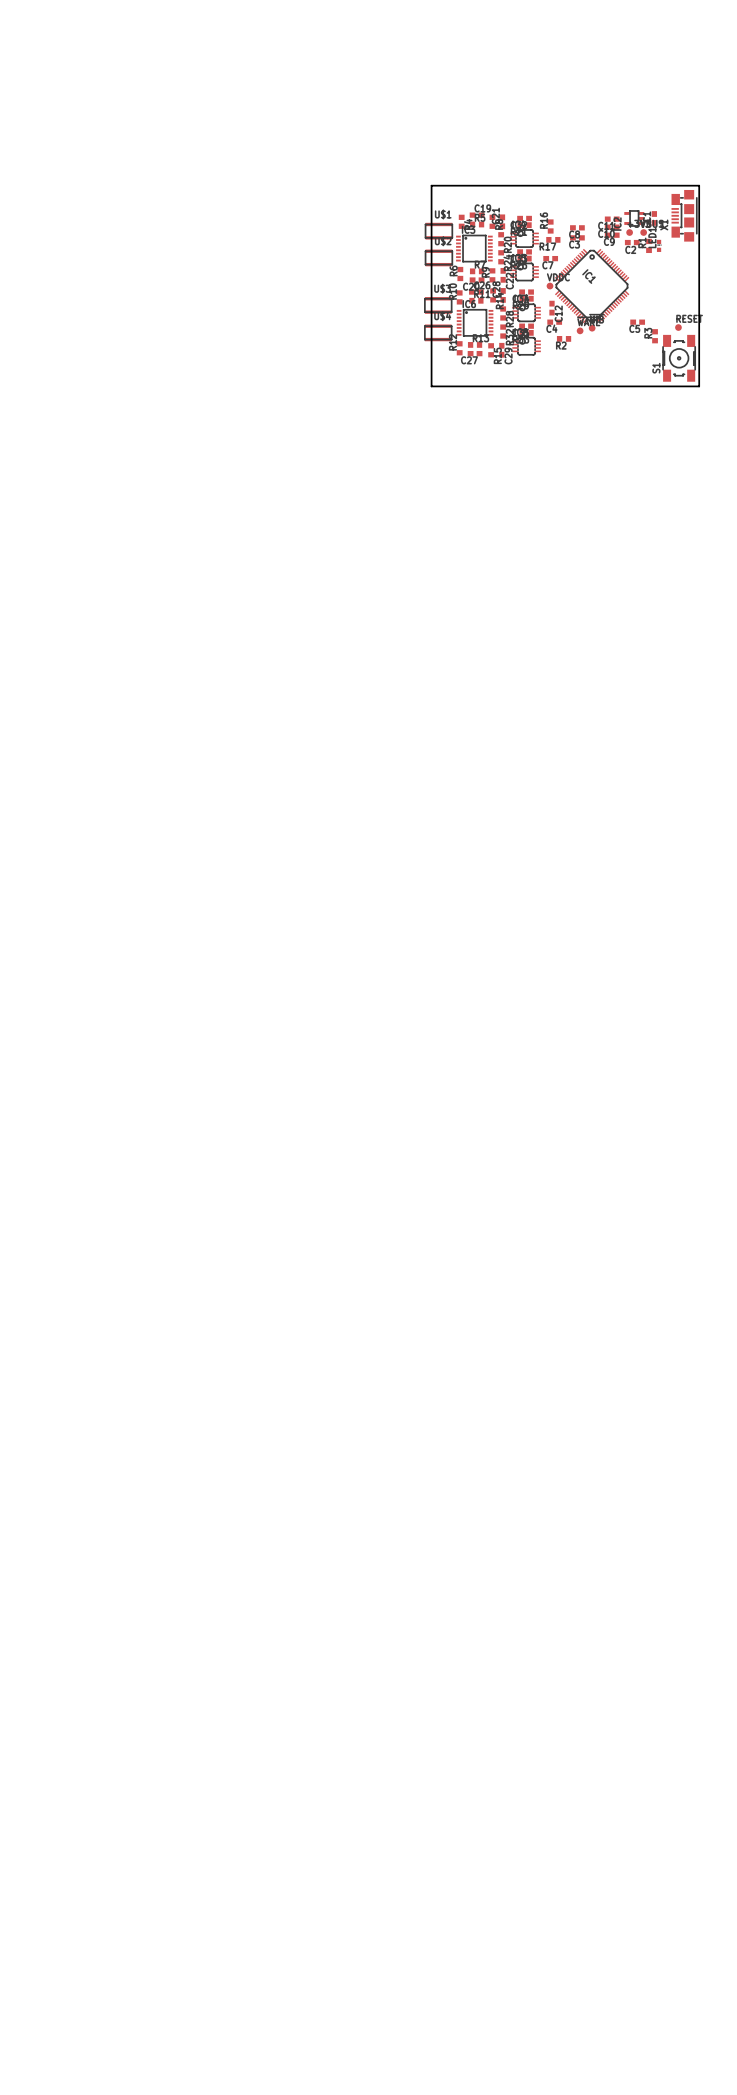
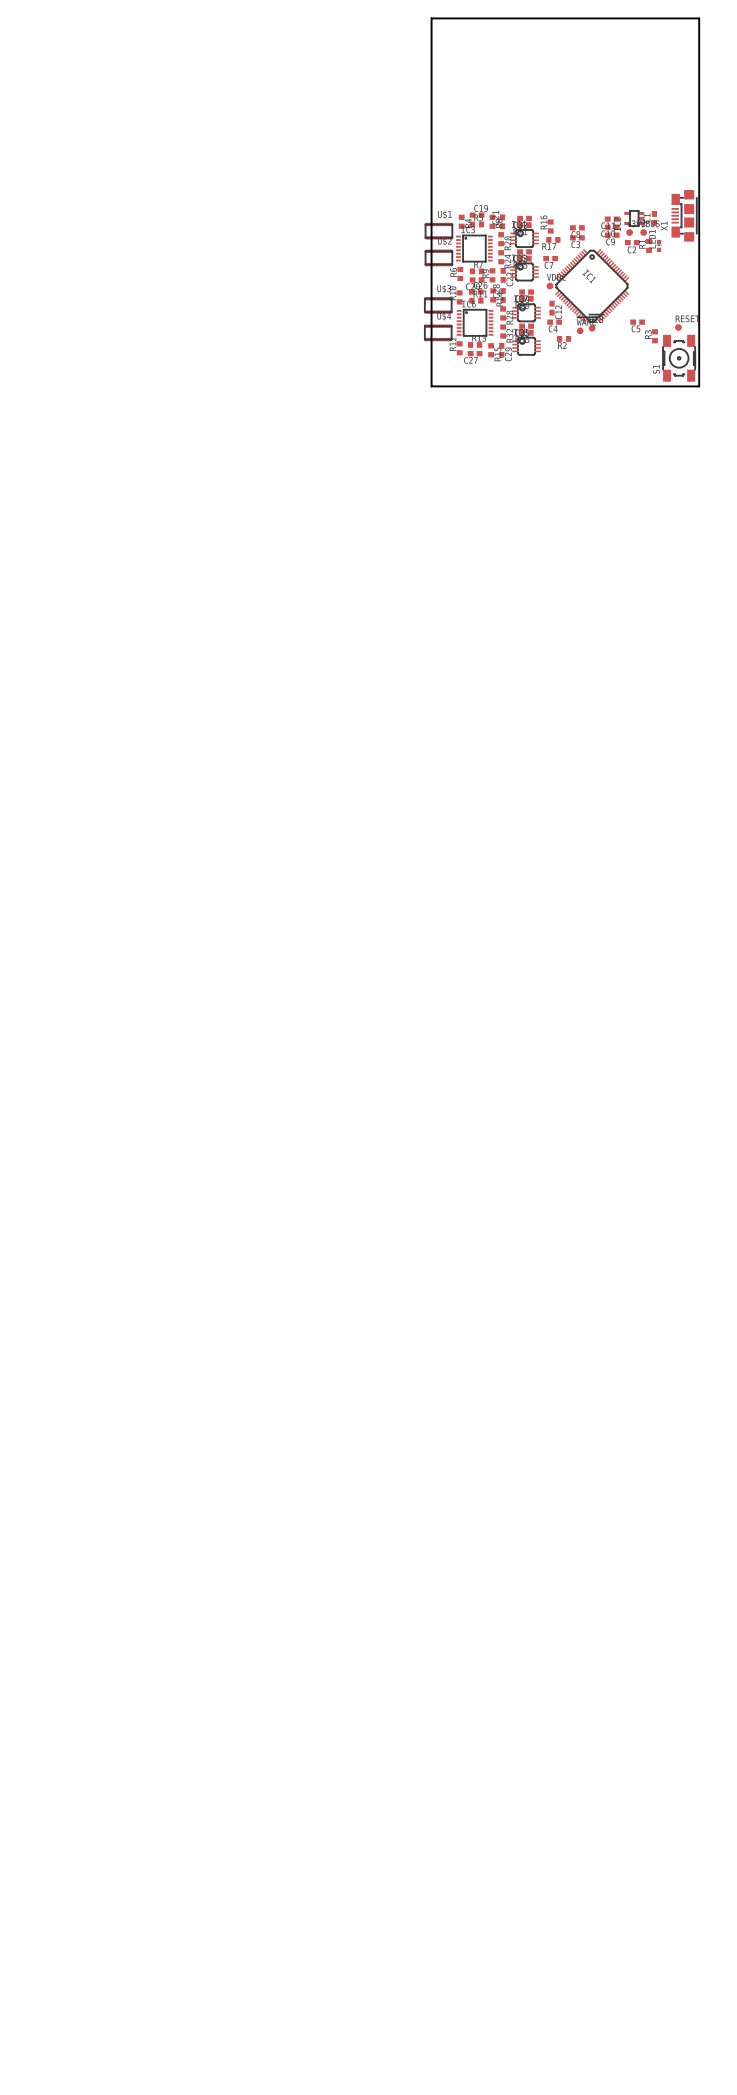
board edge: (431, 185) (699, 185) -> (431, 185) (431, 18) (699, 18) (699, 185)

